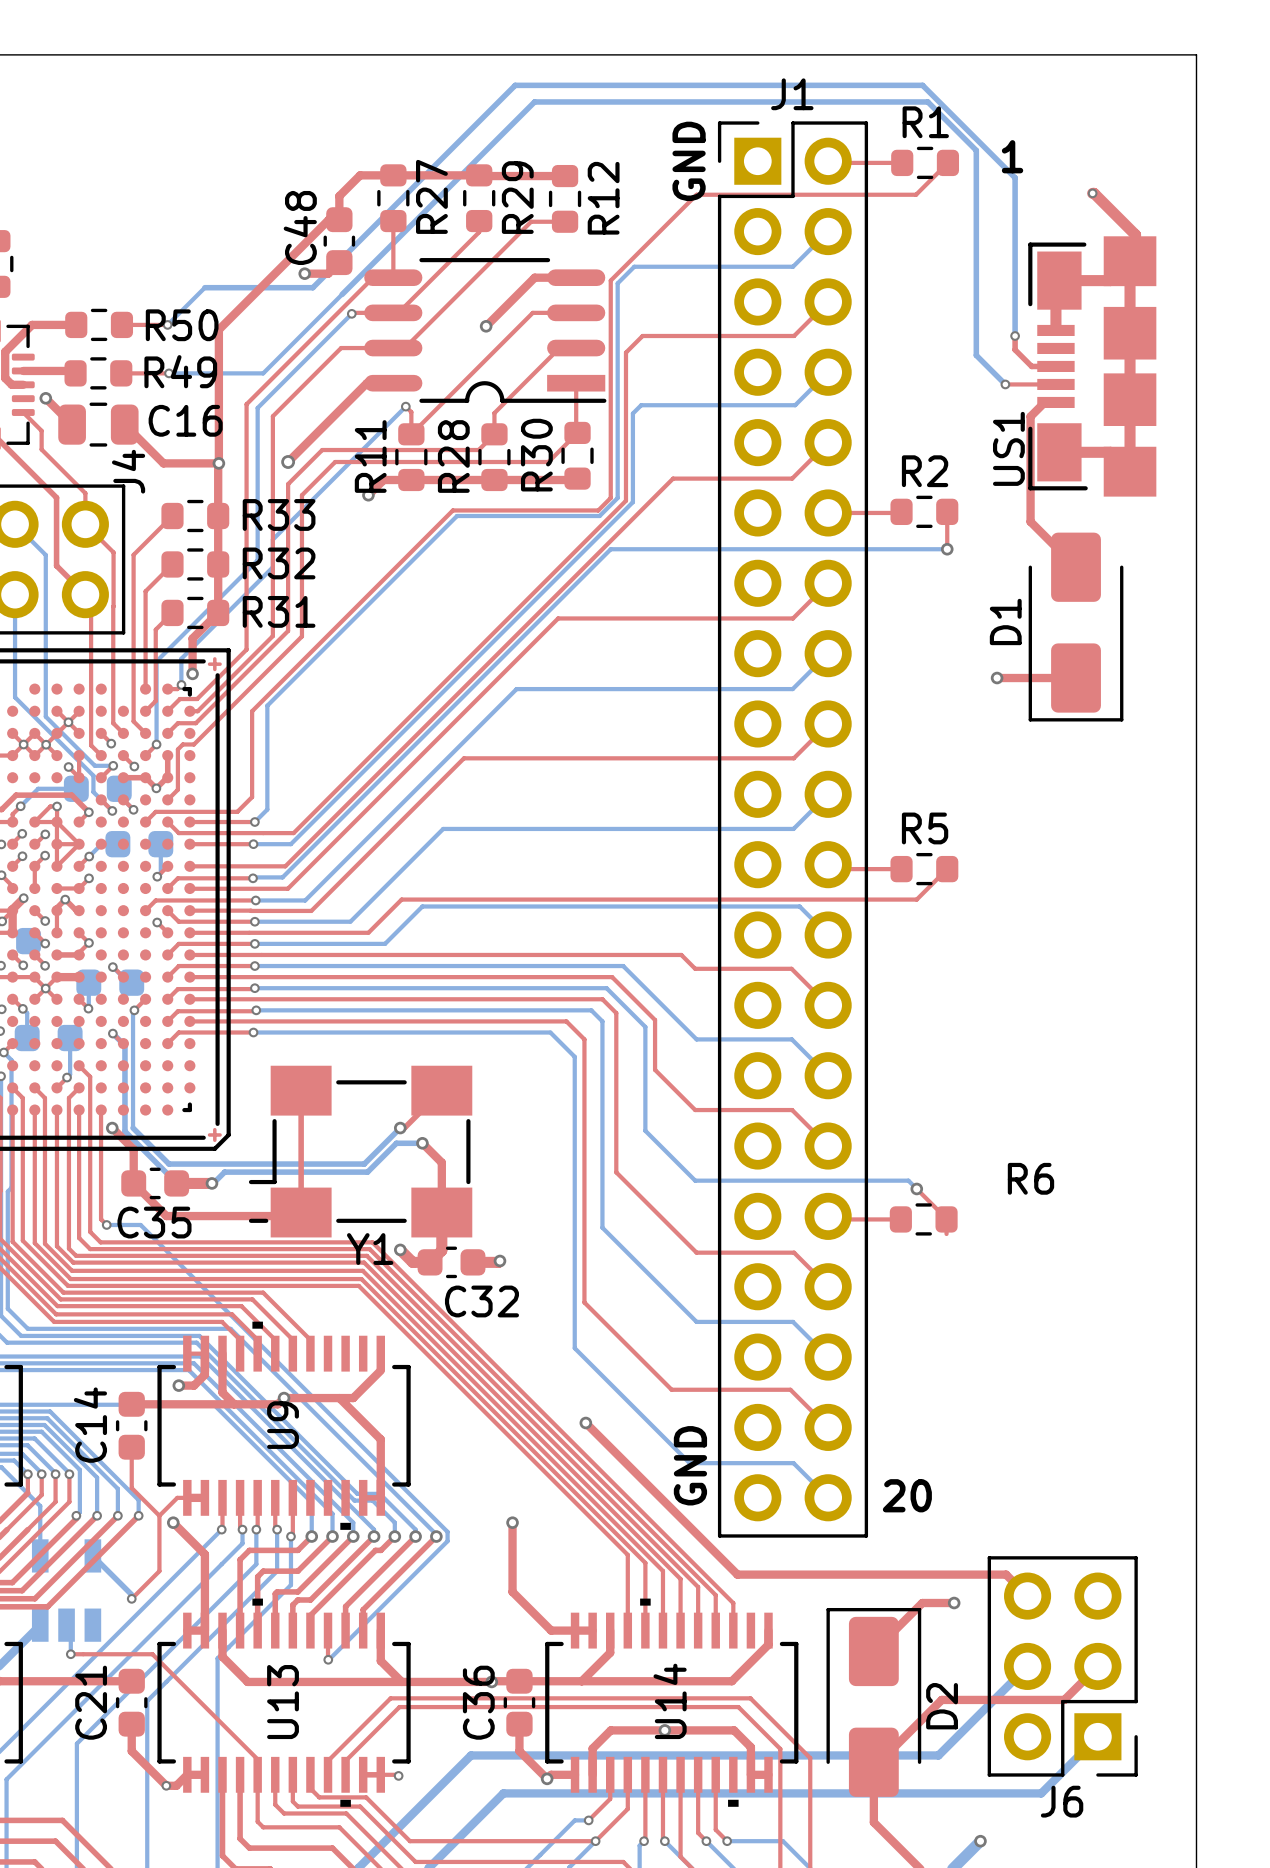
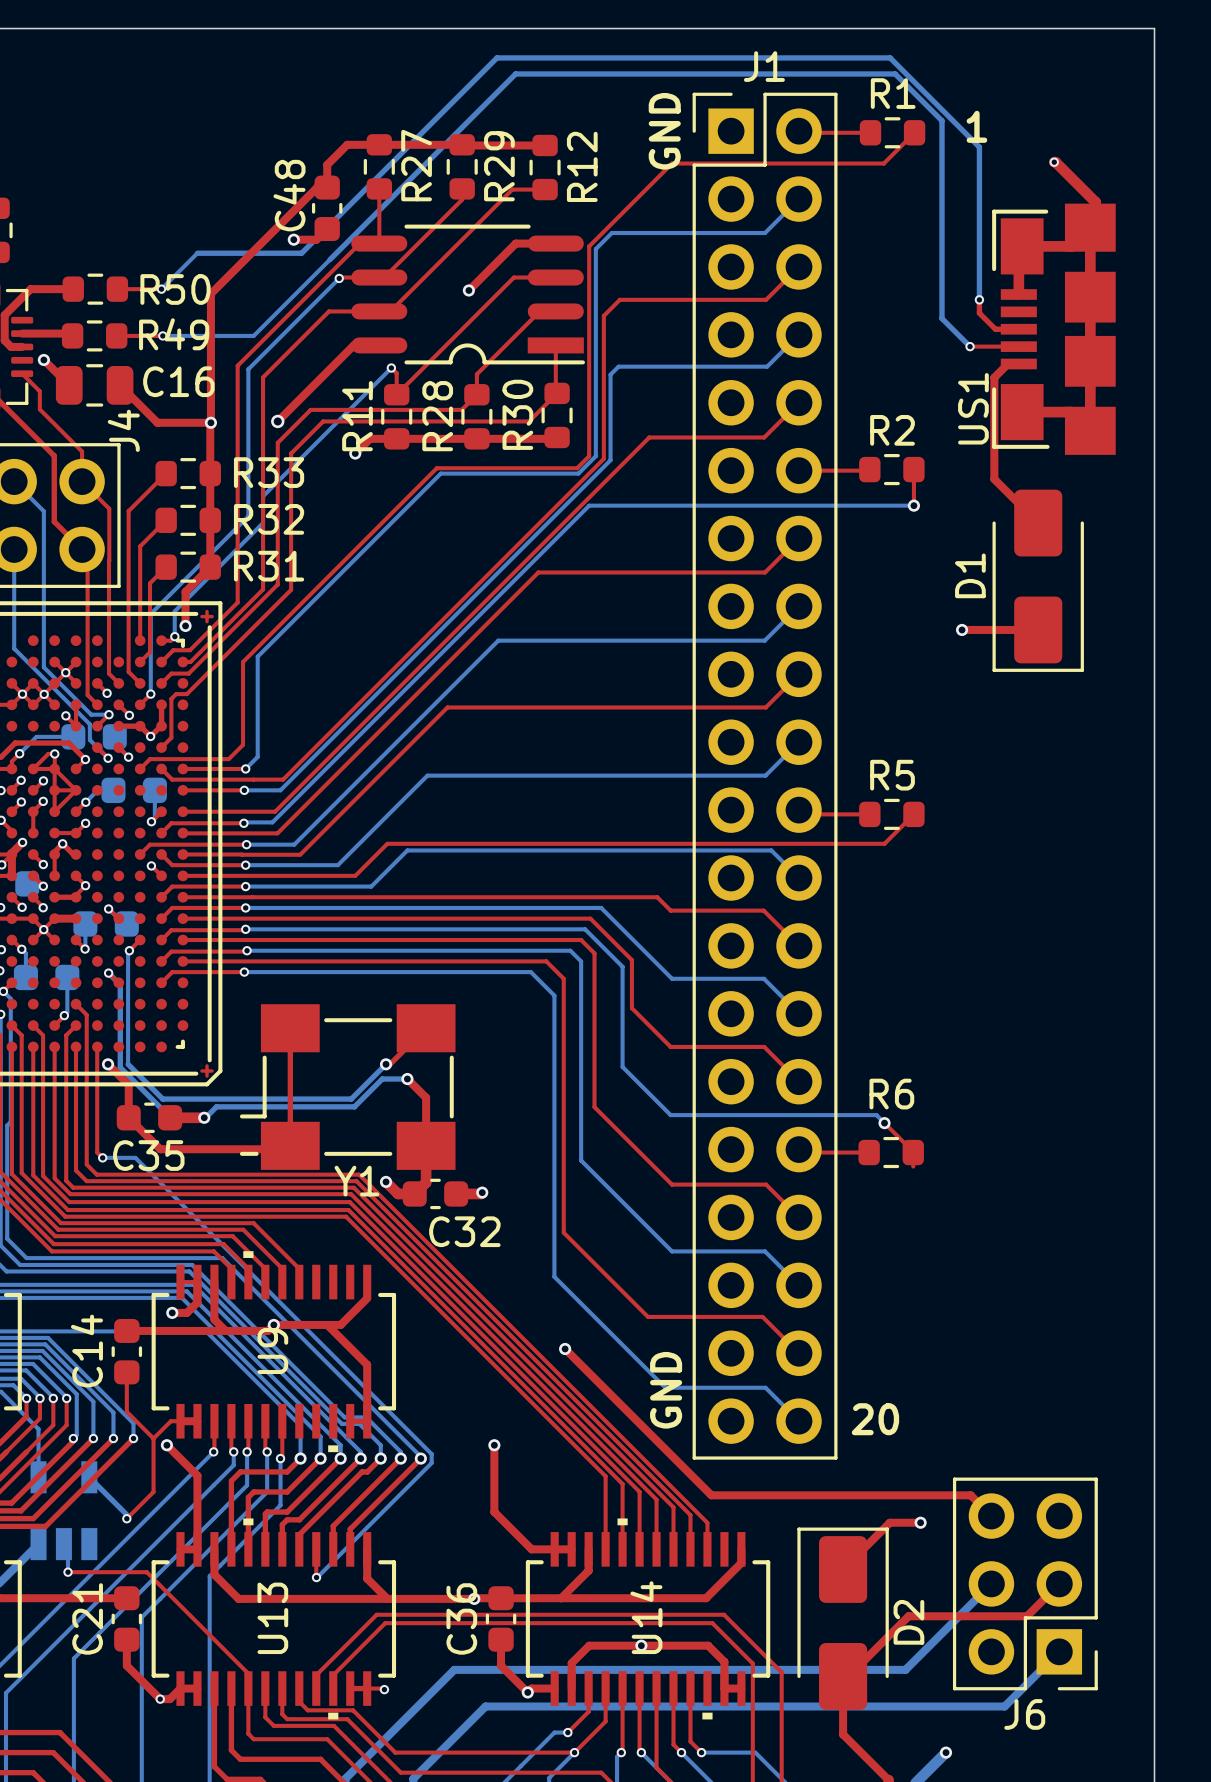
R6 name position: R6 (1030, 1178) -> R6 (891, 1094)

